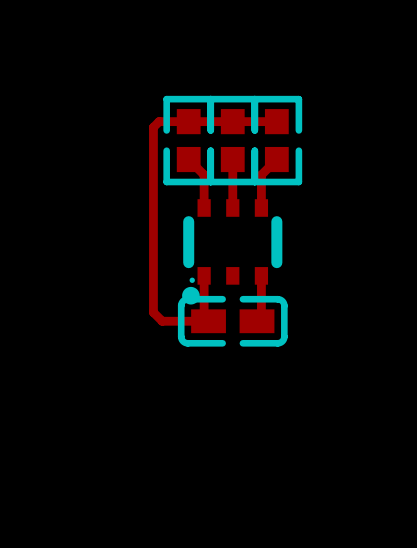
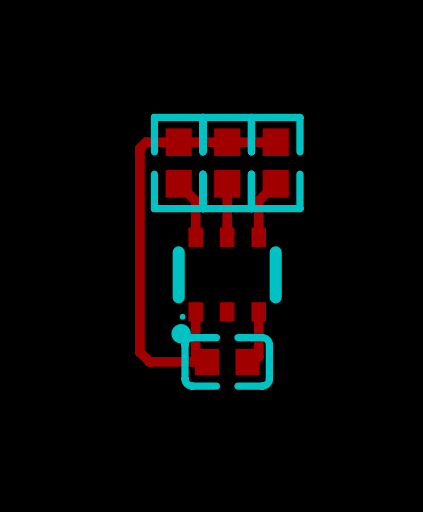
part footprint: [177, 295, 288, 347] -> [181, 333, 274, 390]

